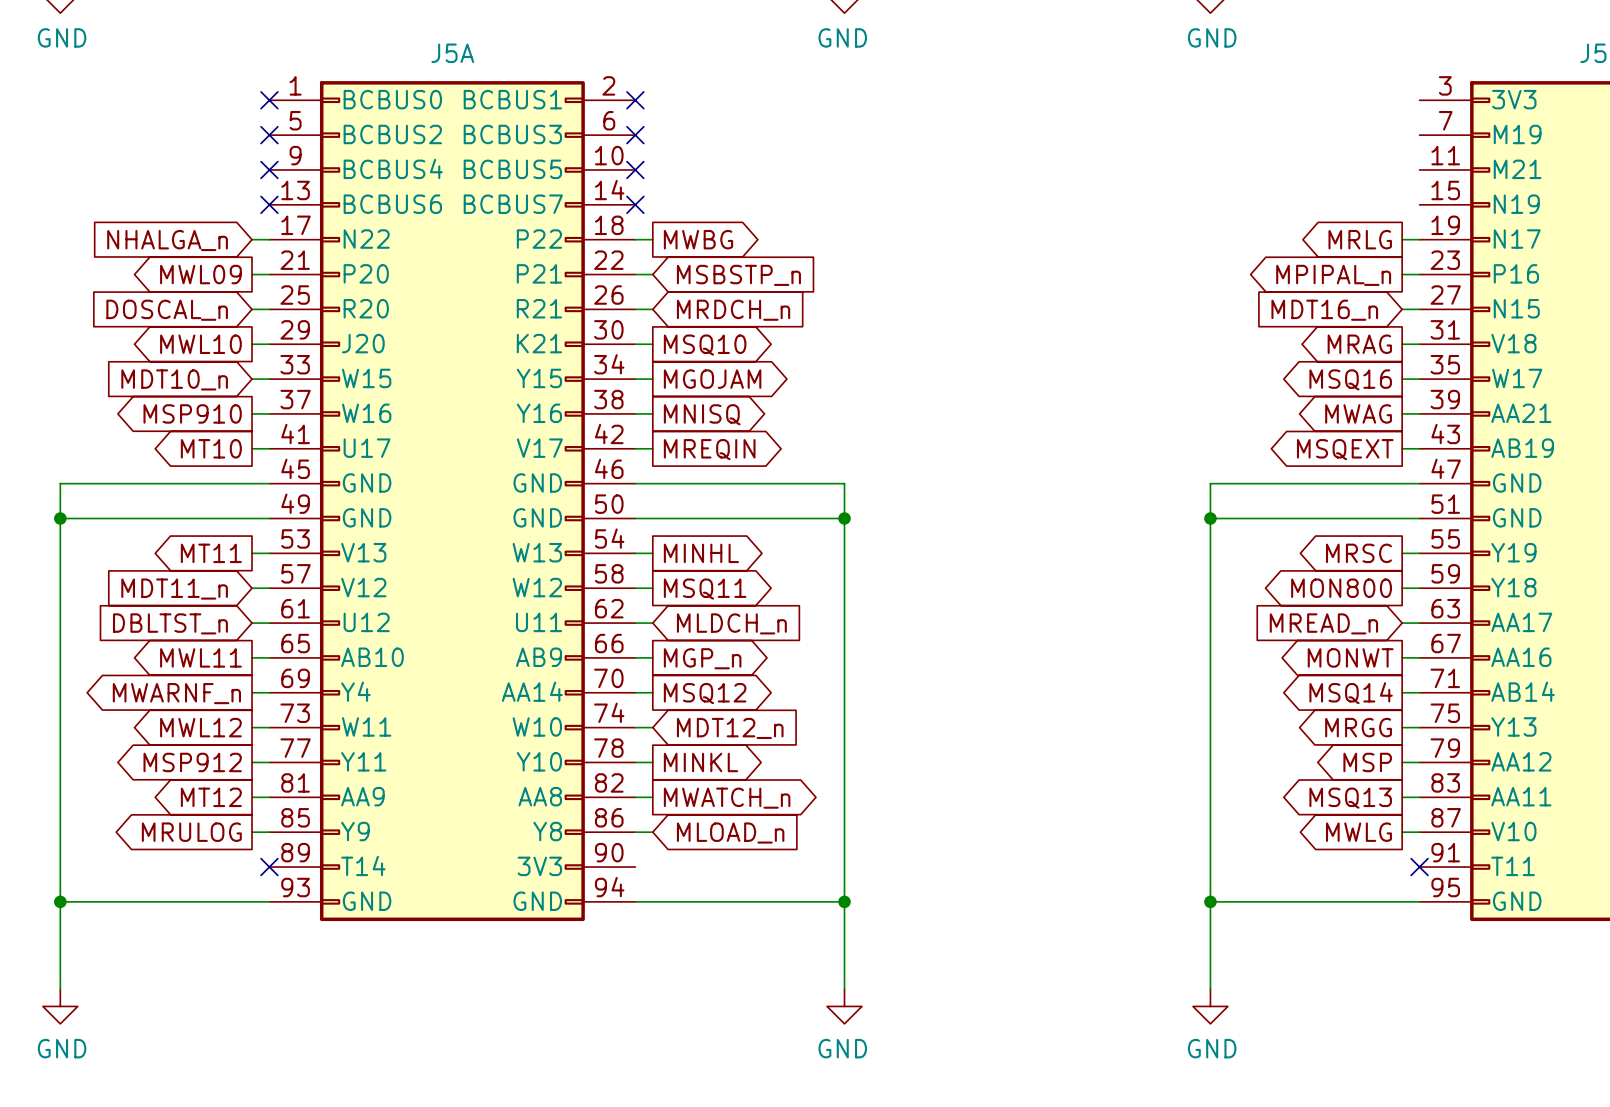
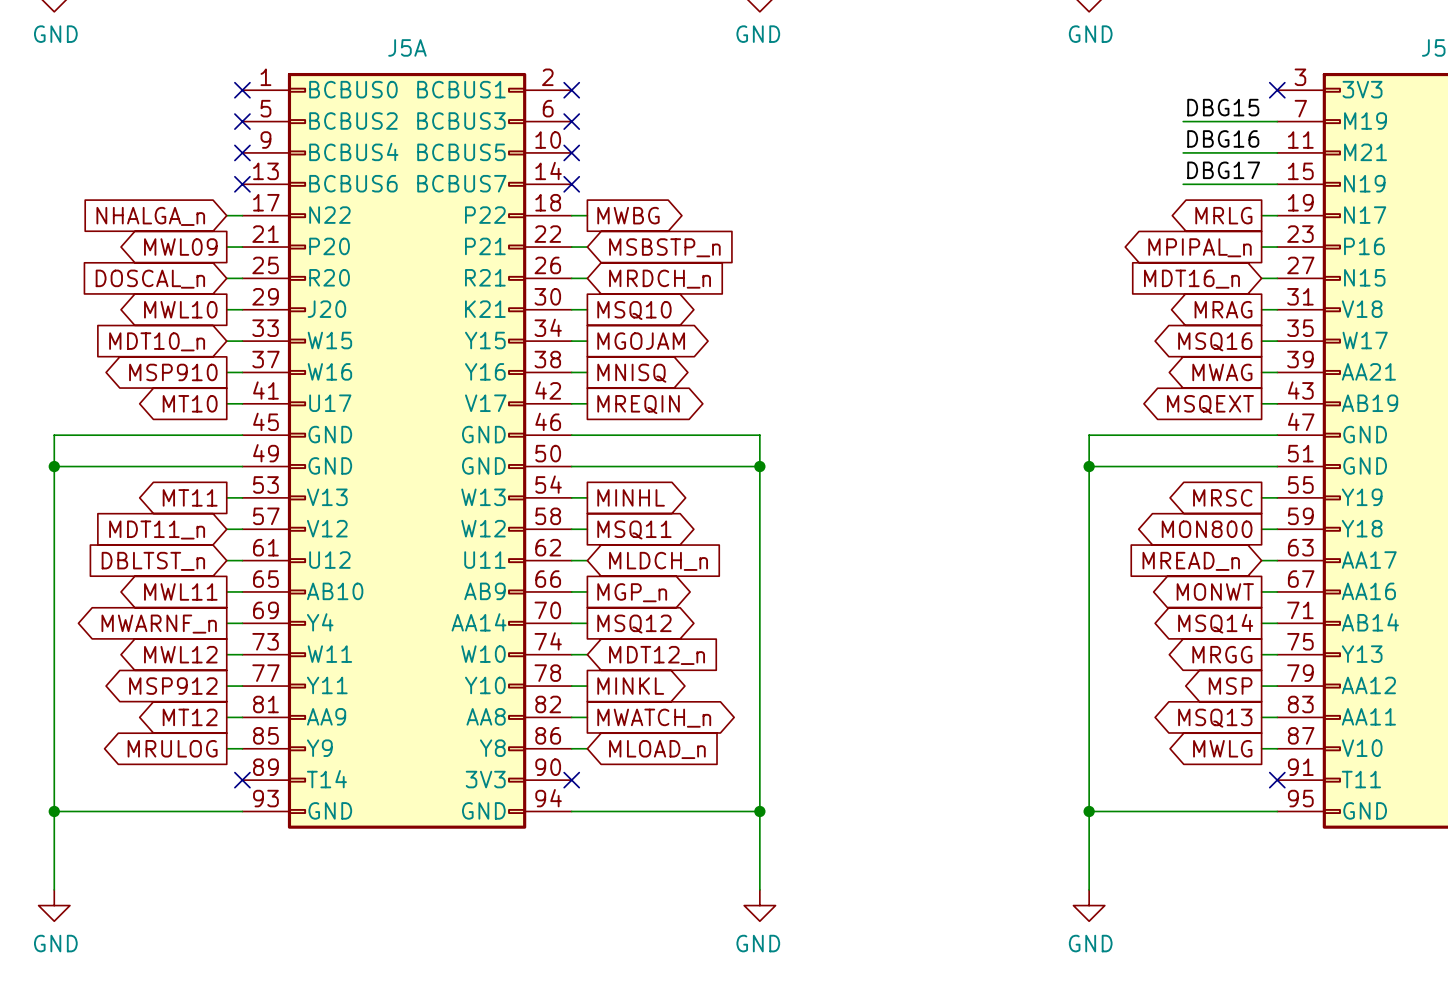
no-connect mark: none -> (1277, 90)
label: none -> DBG15 (1223, 107)
wire: none -> (1183, 121) (1277, 121)
label: none -> DBG16 (1223, 138)
wire: none -> (1183, 152) (1277, 152)
label: none -> DBG17 (1223, 170)
wire: none -> (1183, 184) (1277, 184)
no-connect mark: none -> (571, 780)

